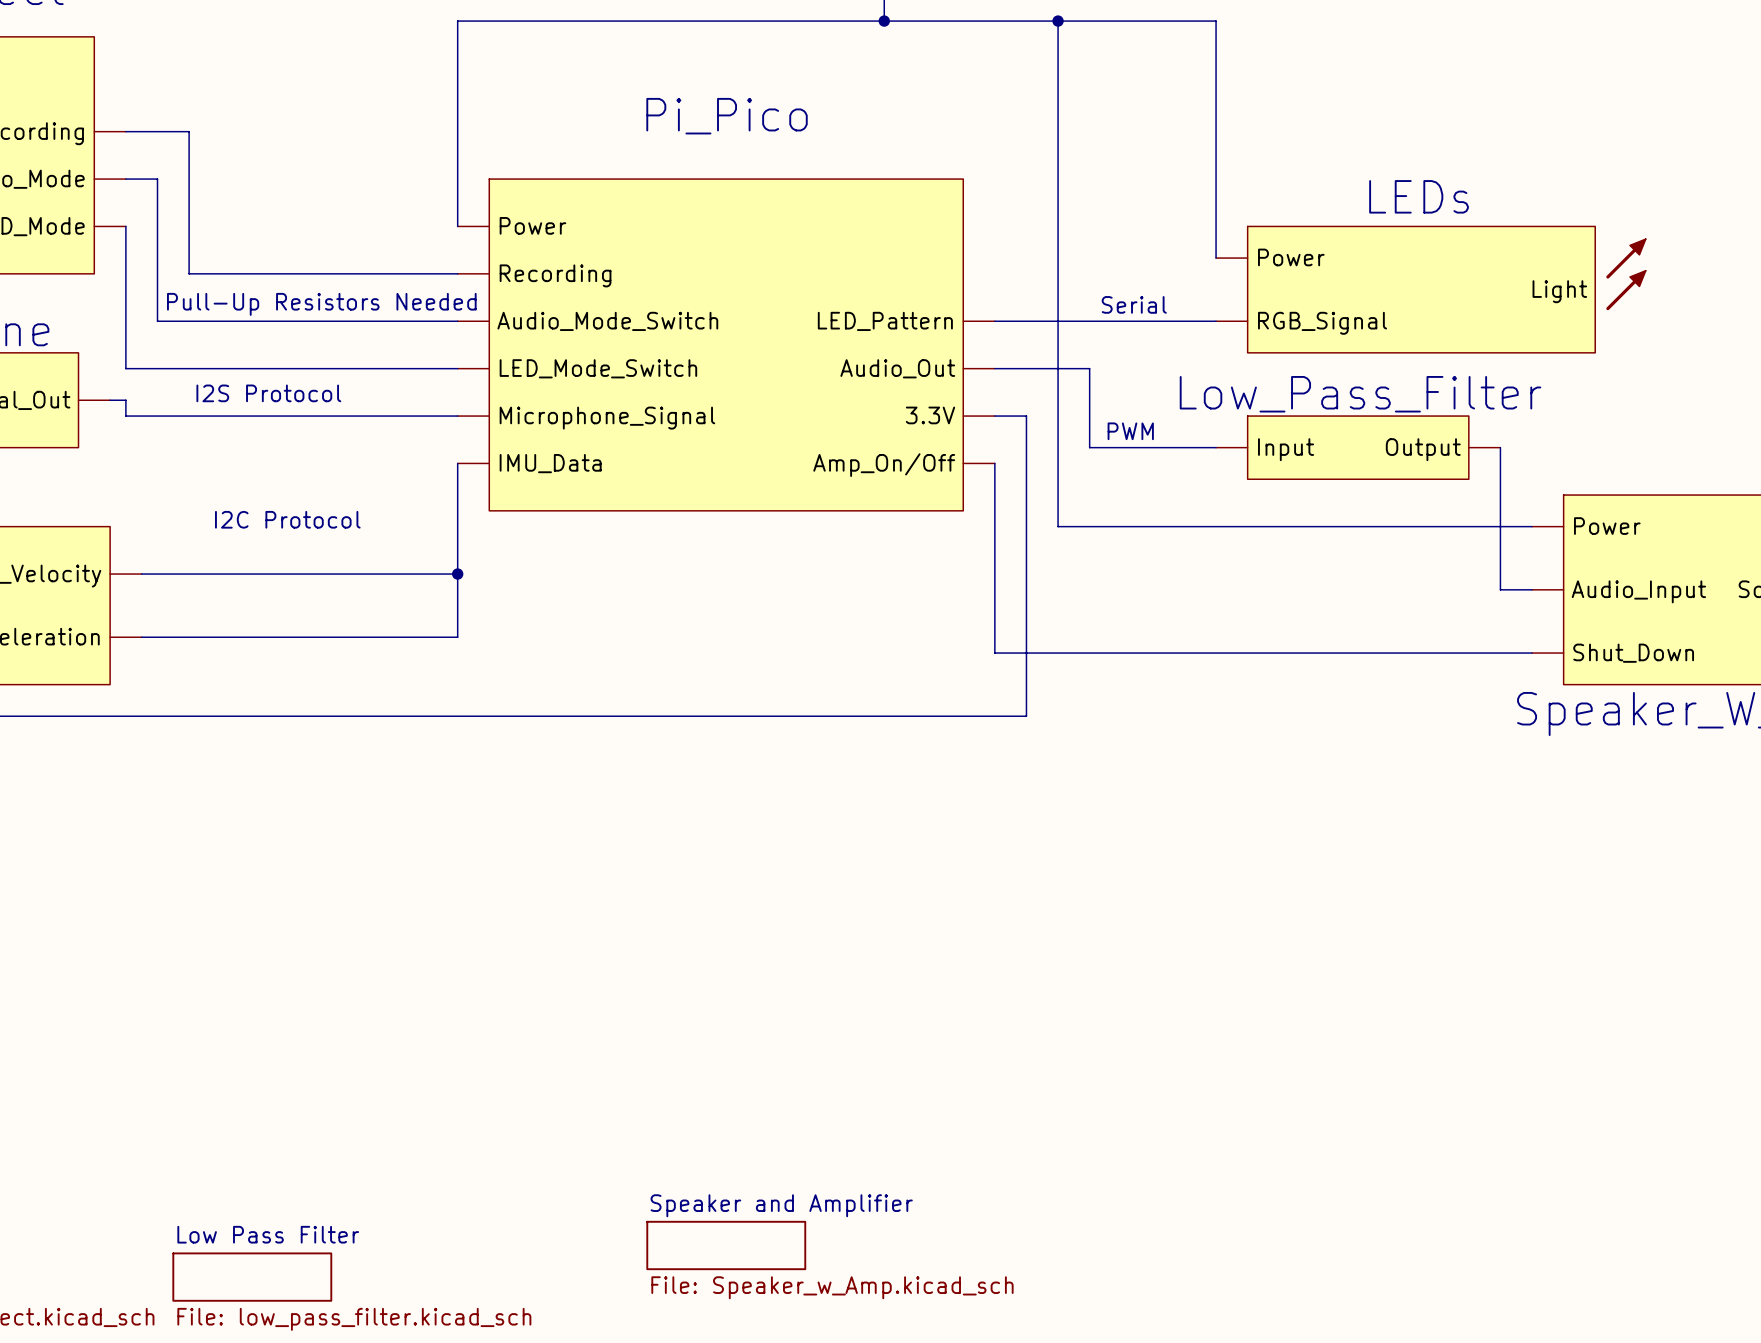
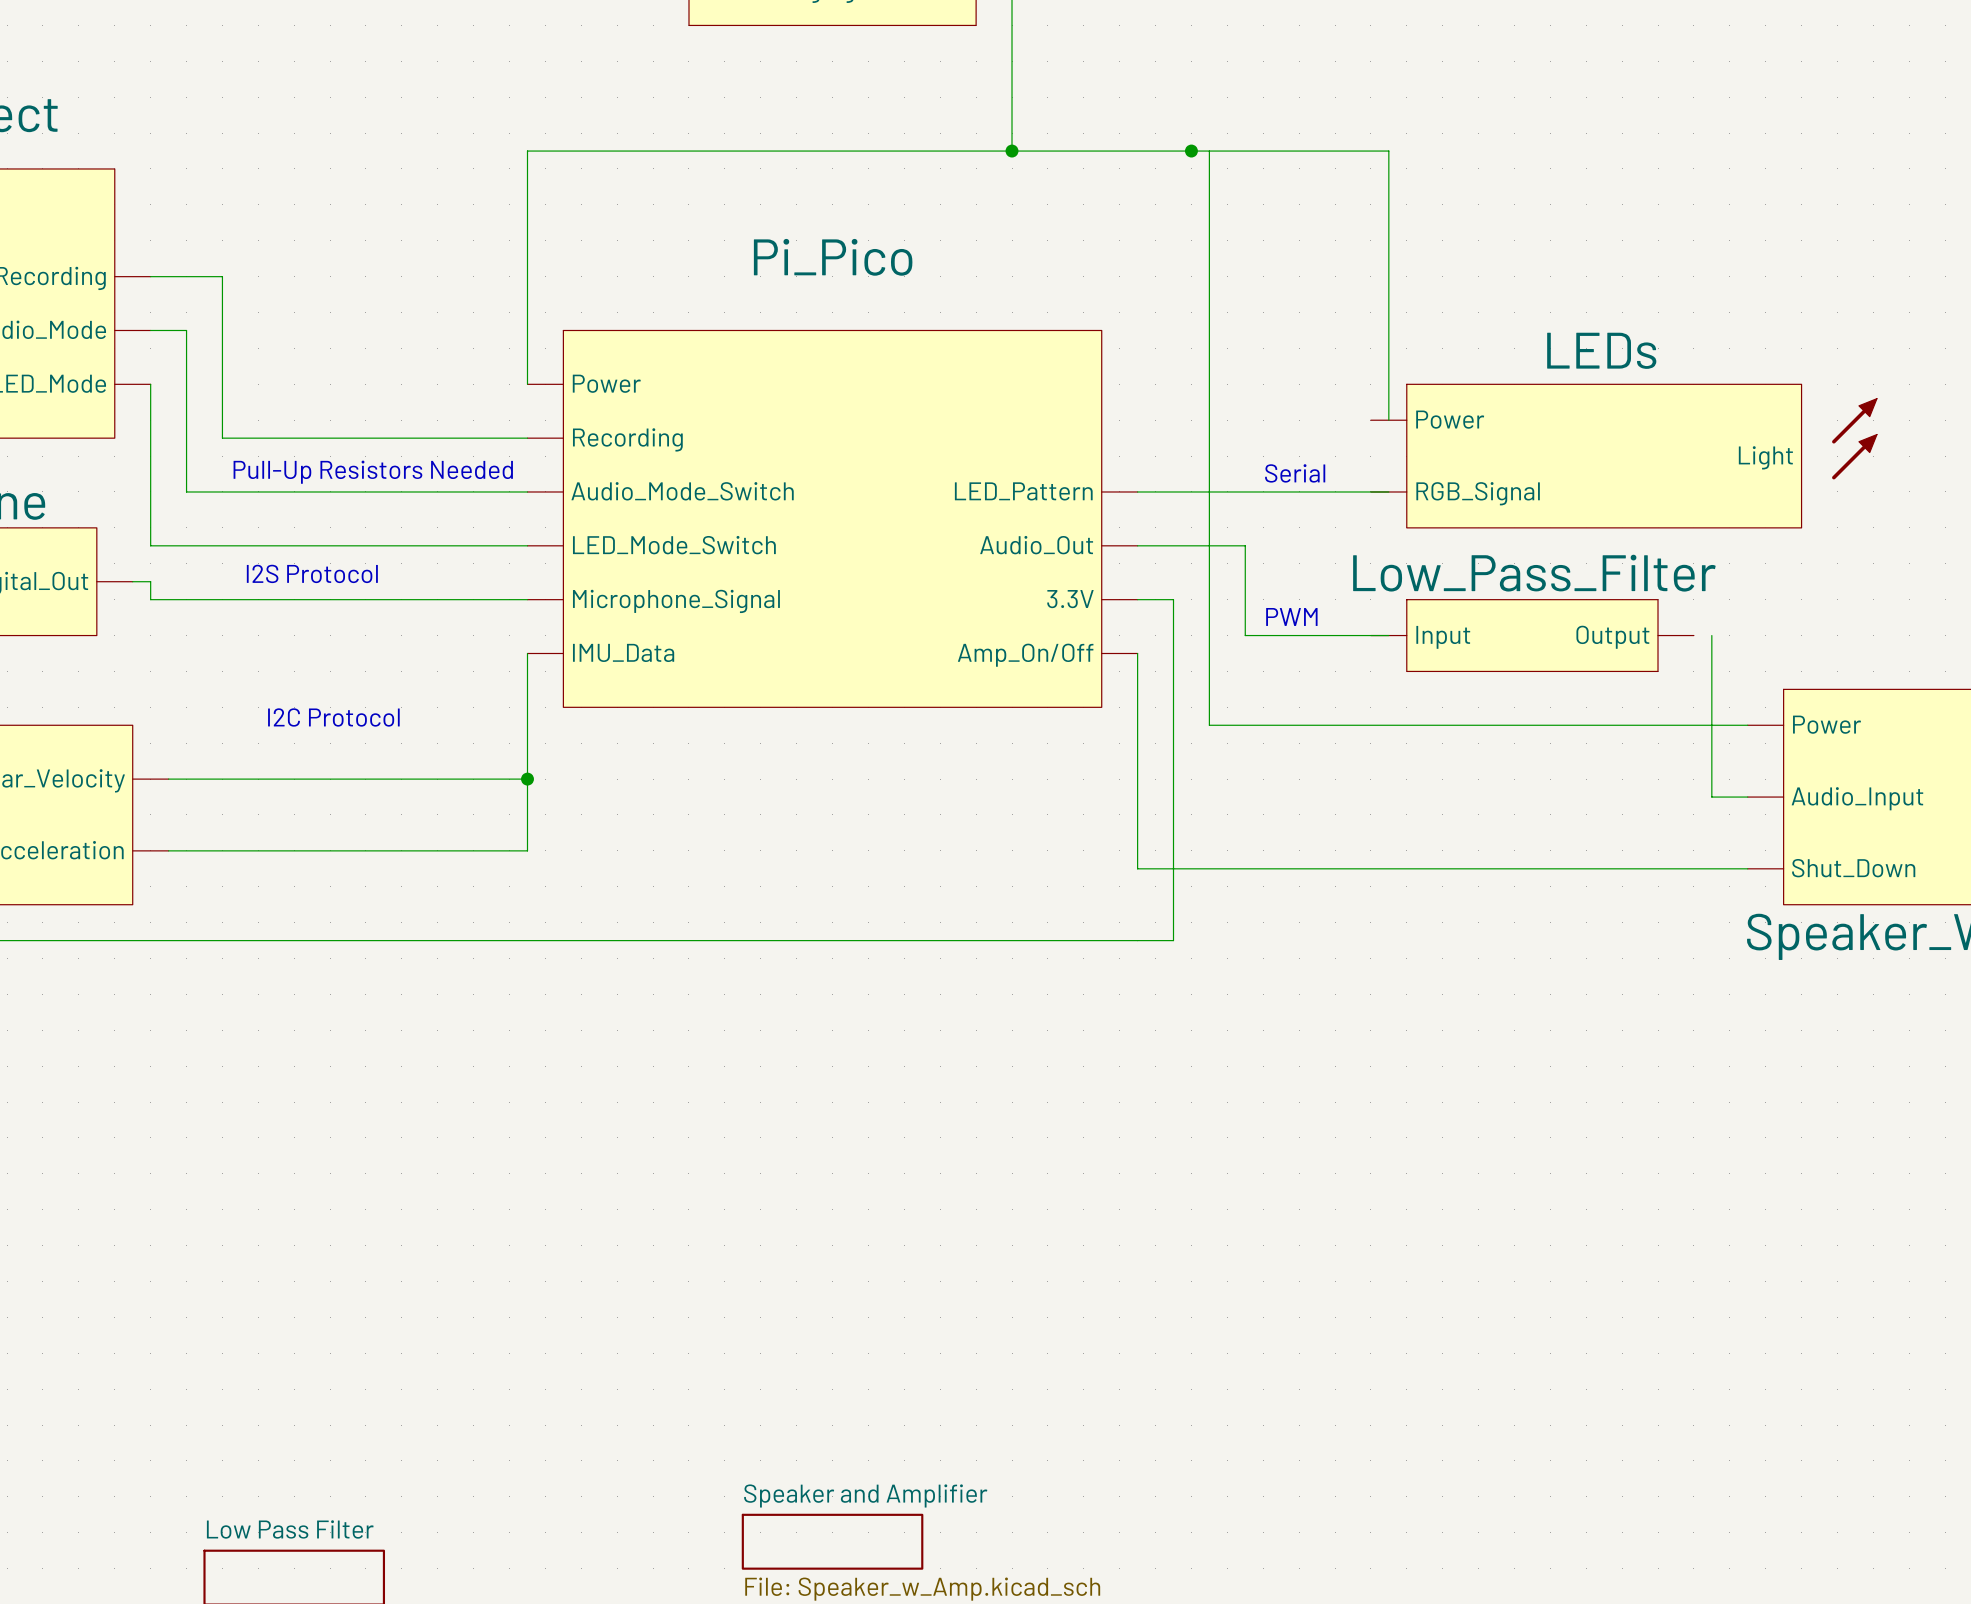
junction position: (1058, 21) -> (1191, 151)
LEDs position: (1405, 289) -> (1586, 456)
Low_Pass_Filter position: (1358, 439) -> (1532, 626)

